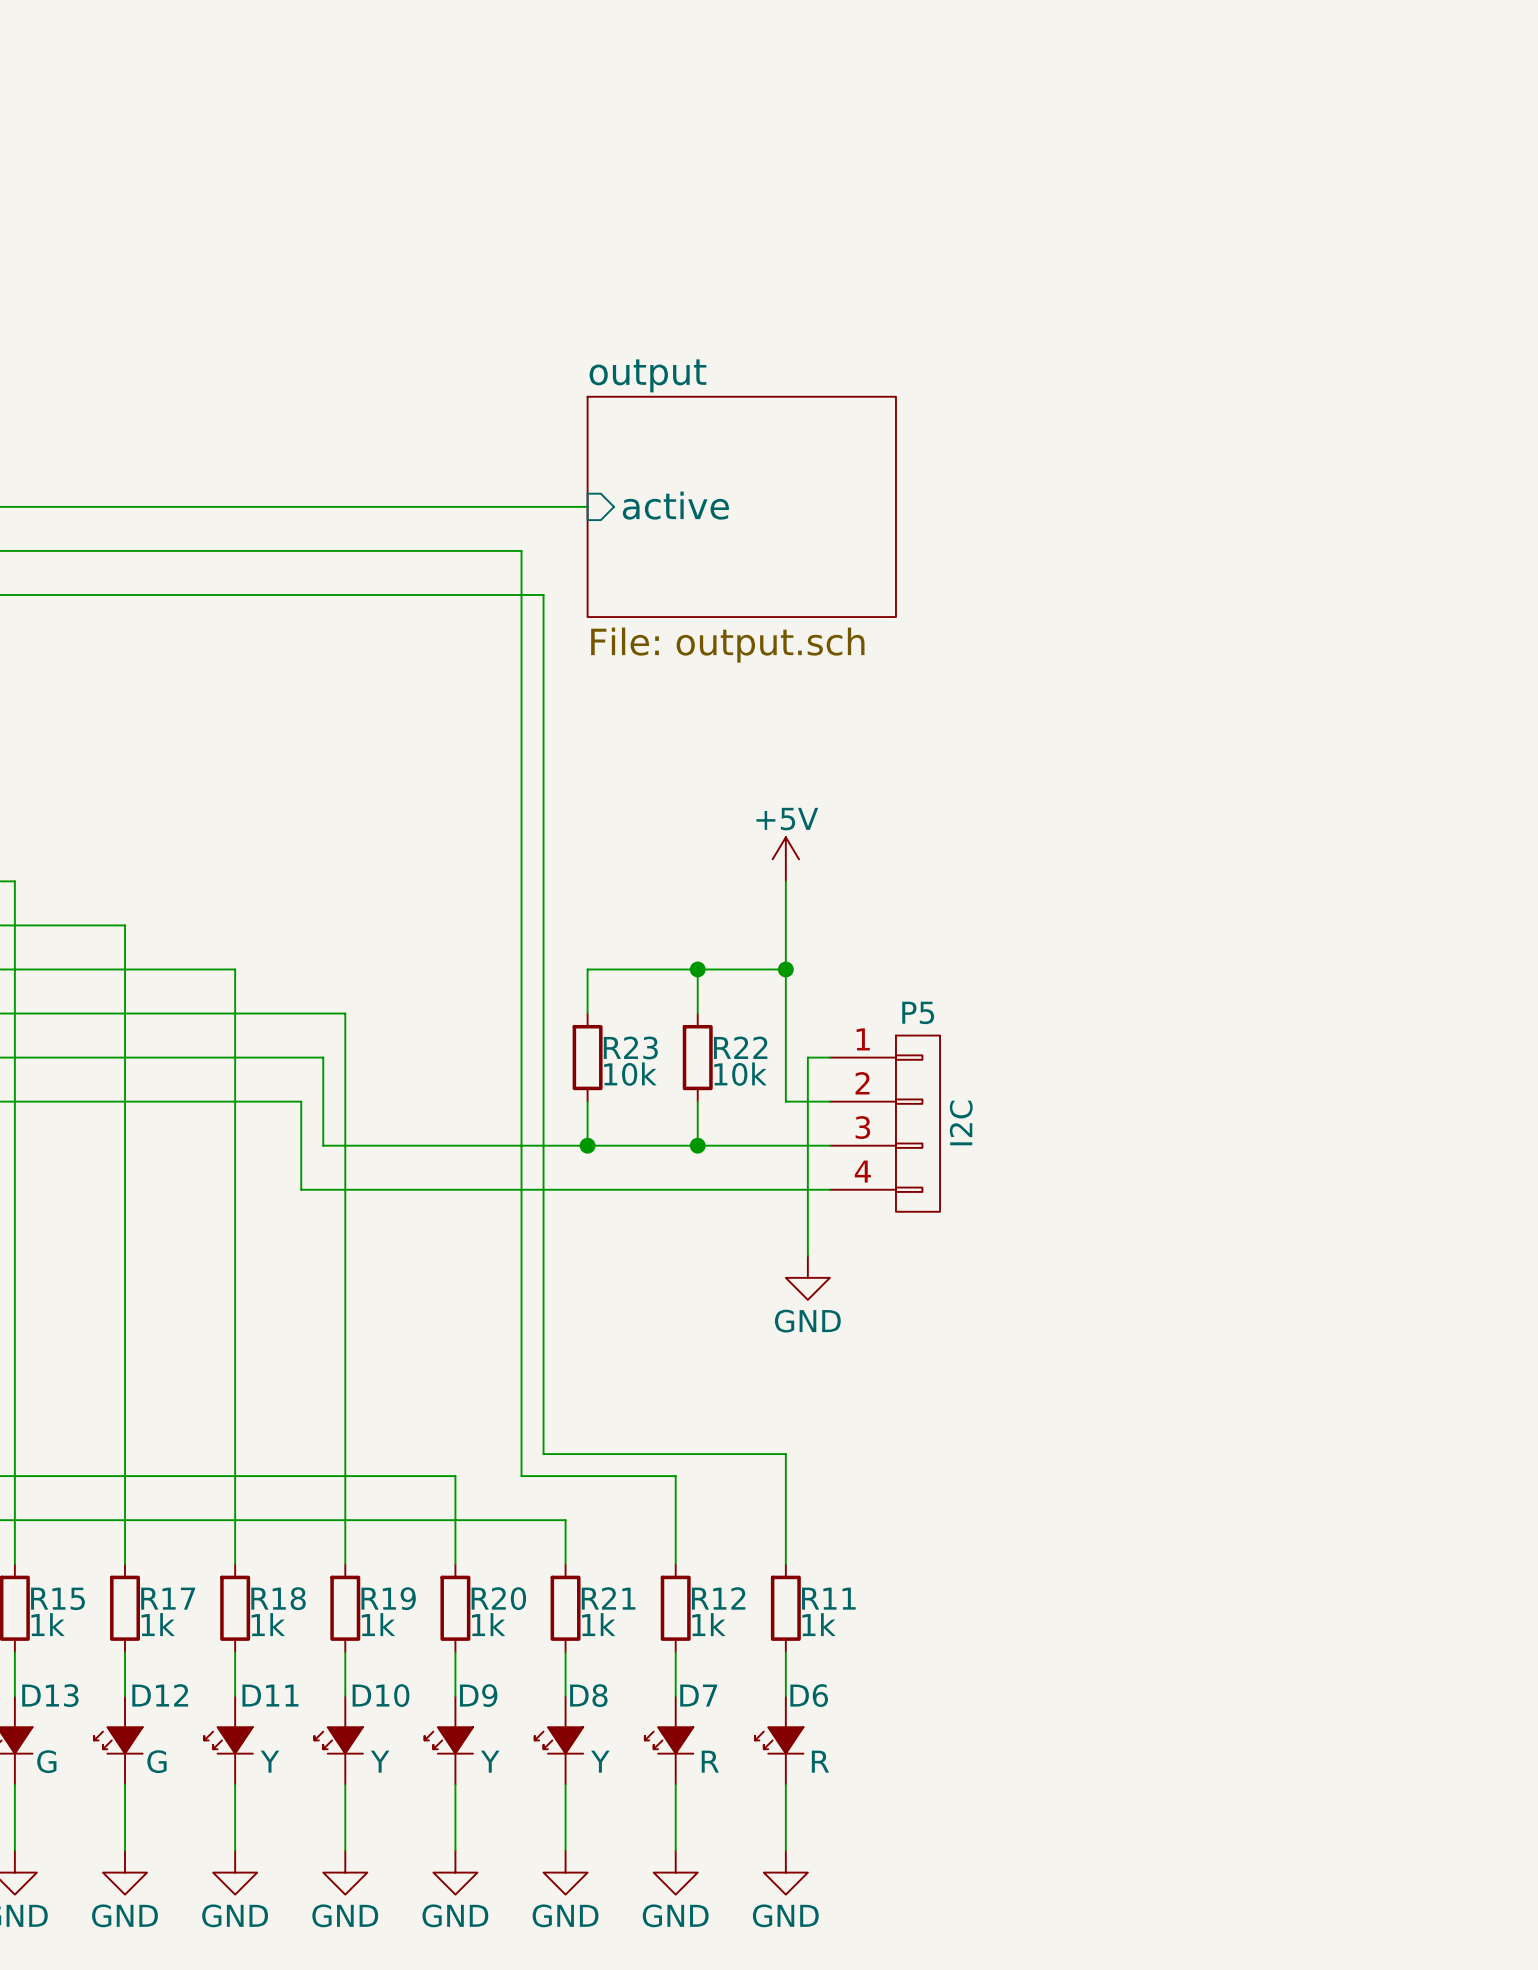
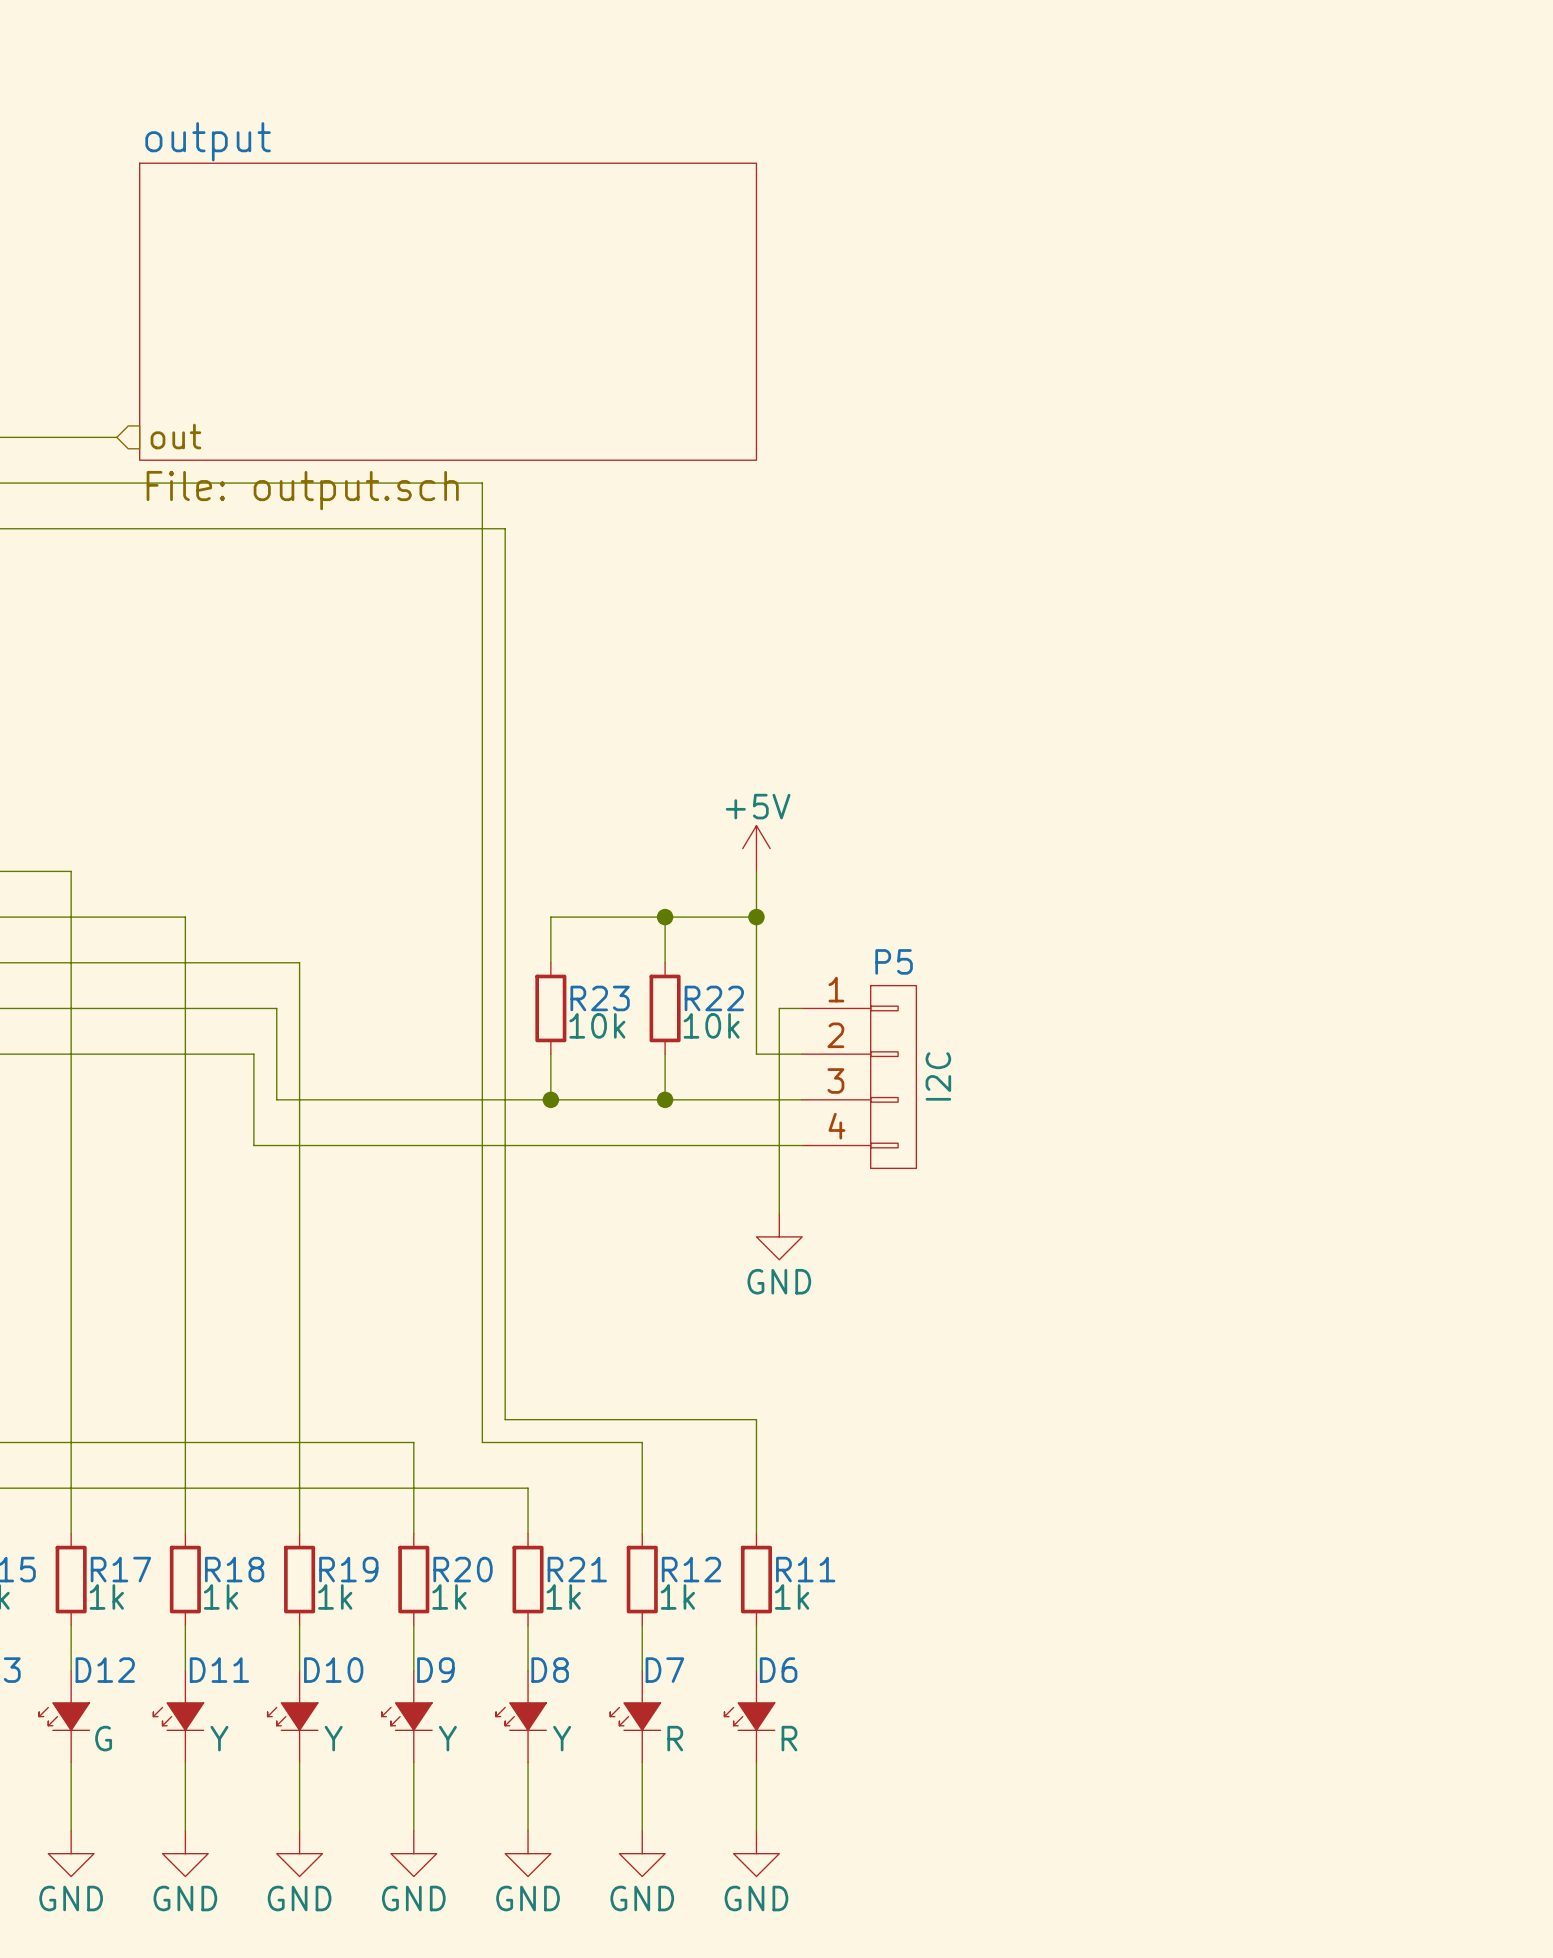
sheet output: none -> File: output.sch (448, 311)
sheet pin: active (675, 505) -> none
wire: (169, 506) (587, 506) -> none
hierarchical label: none -> out (175, 436)
sheet output: File: output.sch (741, 506) -> none
power symbol position: +5V (785, 859) -> +5V (756, 848)

